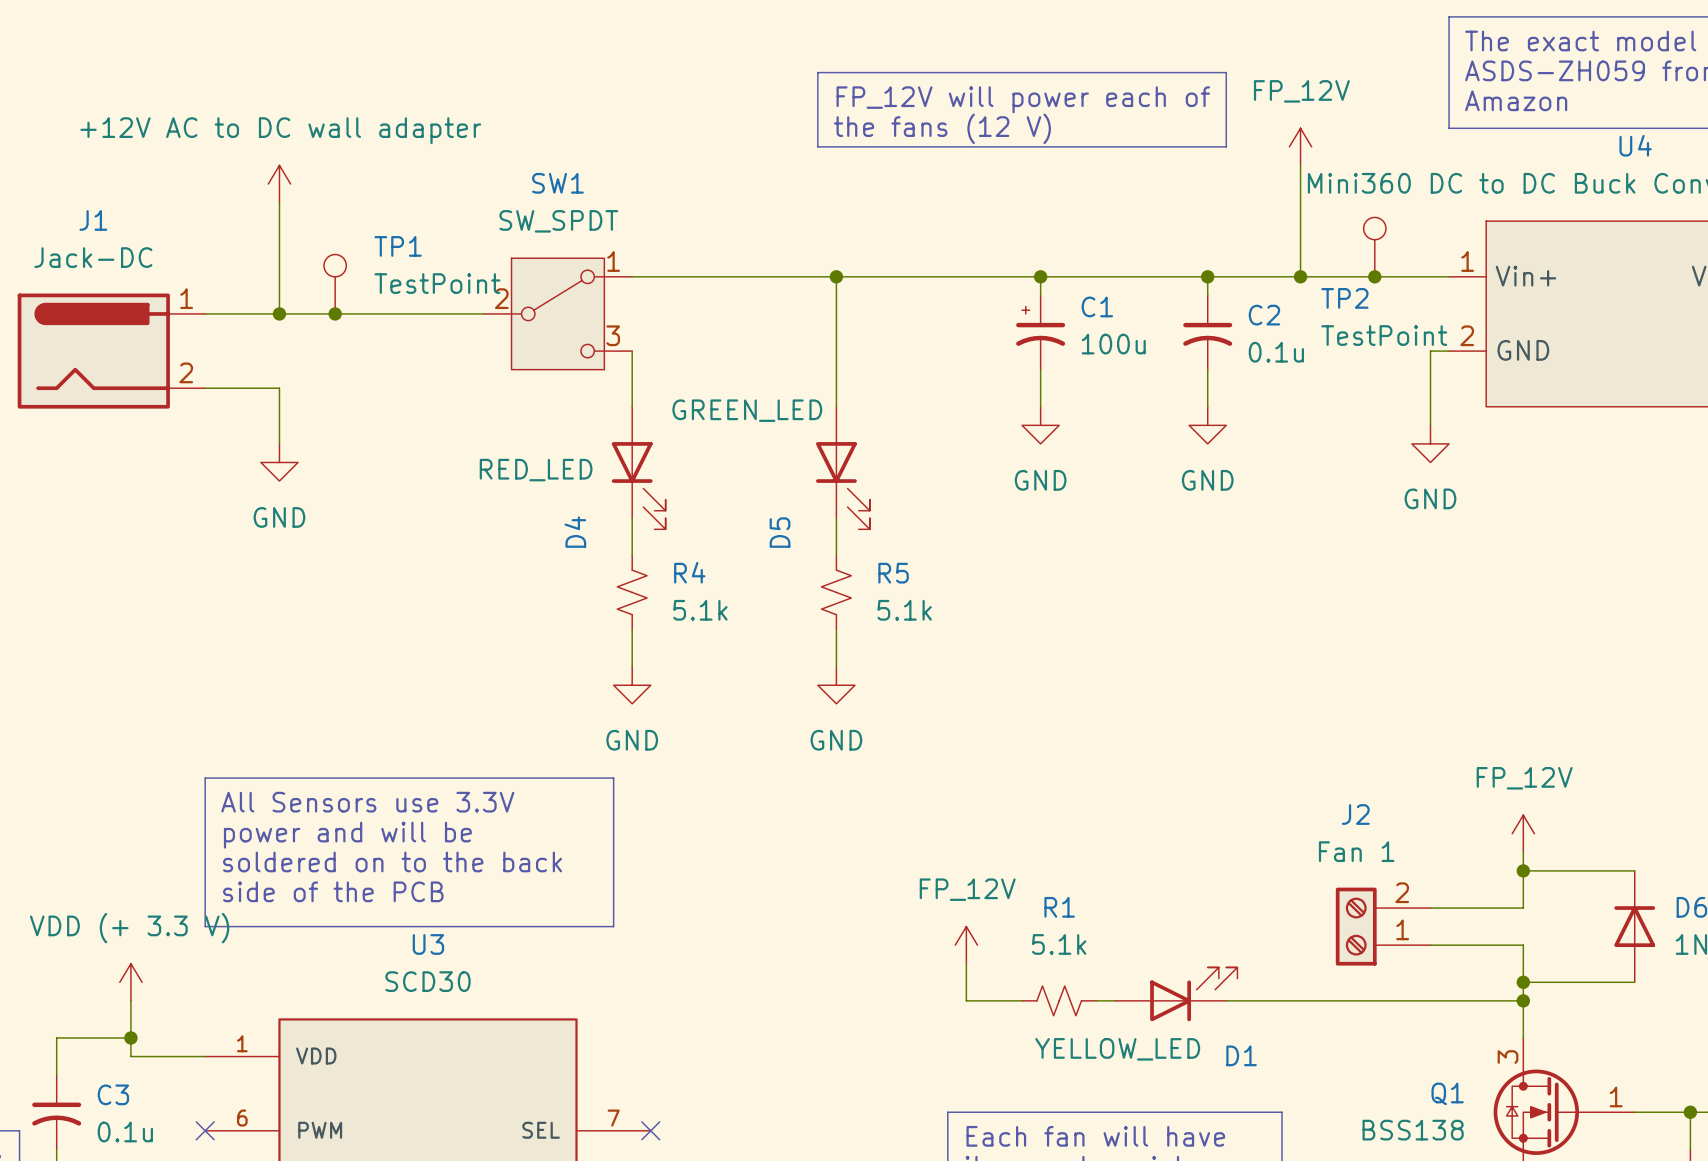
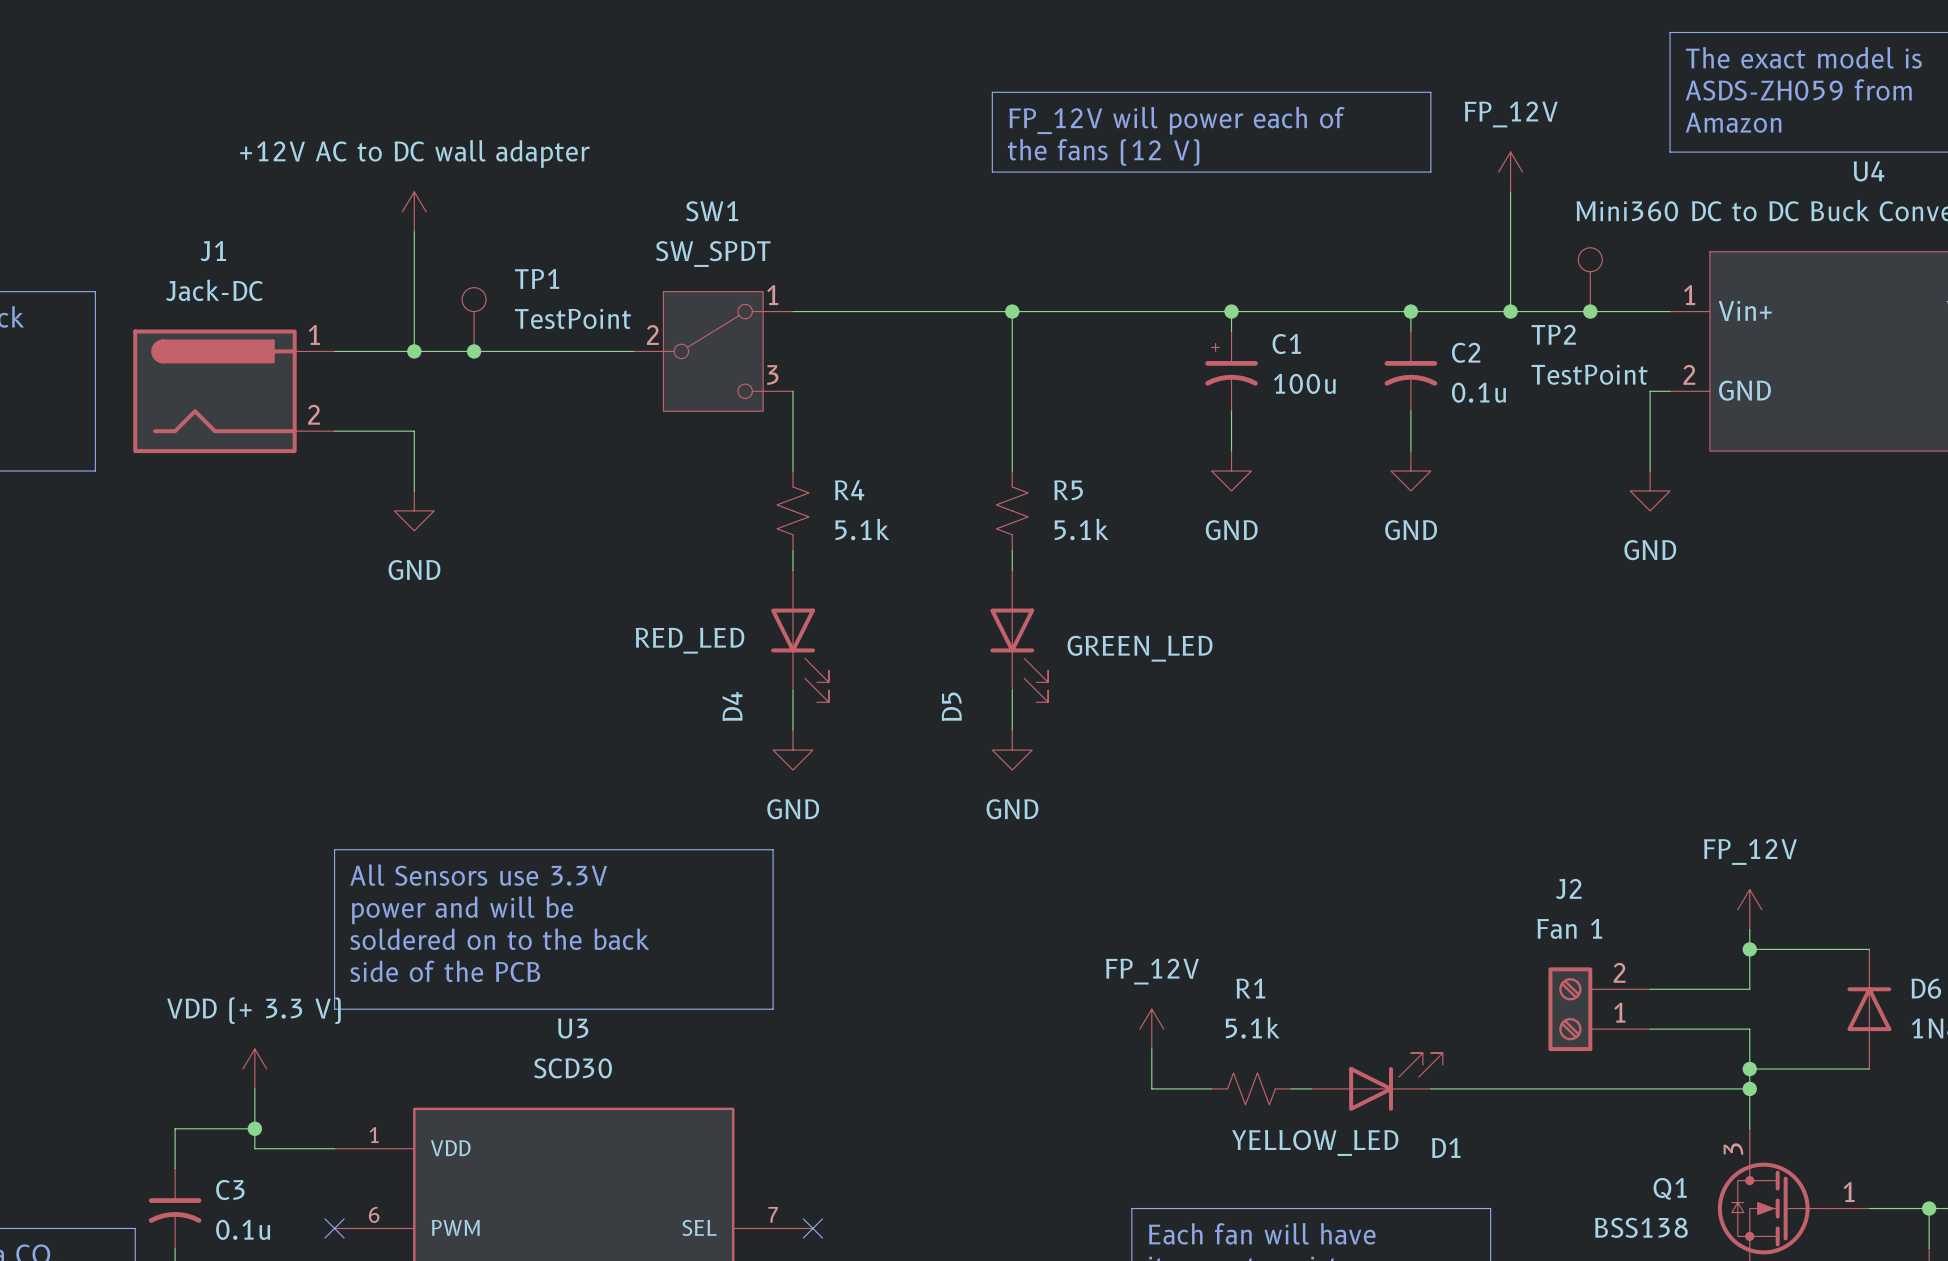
D5 value position: GREEN_LED (747, 410) -> GREEN_LED (1140, 648)
D4 position: (638, 468) -> (799, 636)
D5 position: (842, 468) -> (1019, 636)
R4 position: (632, 592) -> (793, 510)
R5 position: (836, 592) -> (1012, 510)

